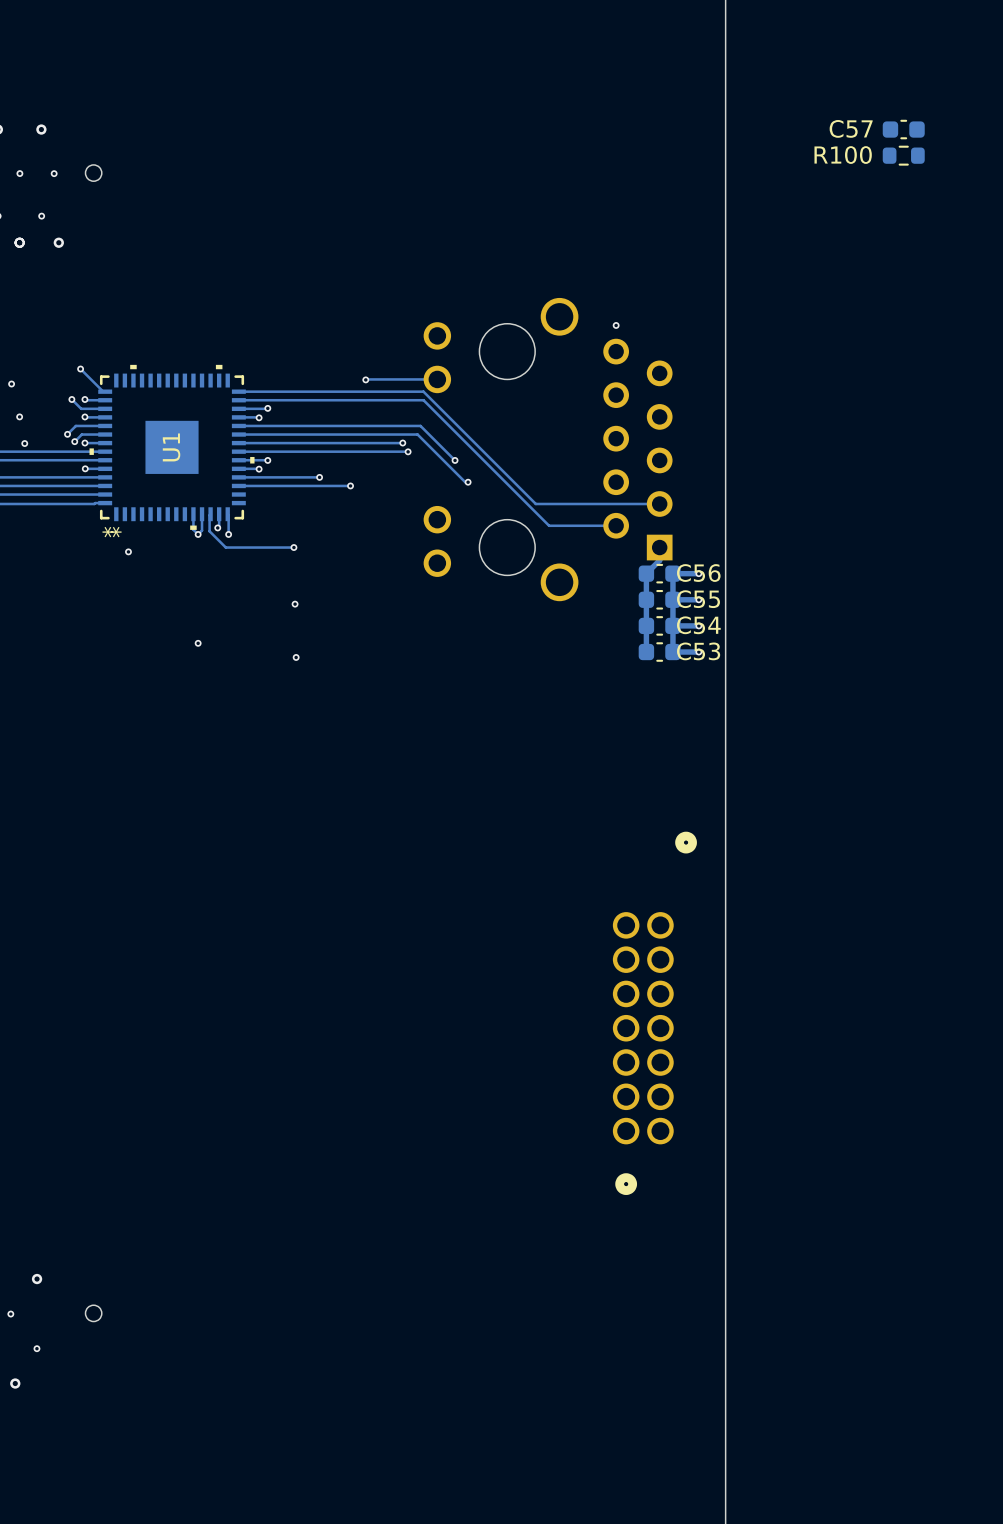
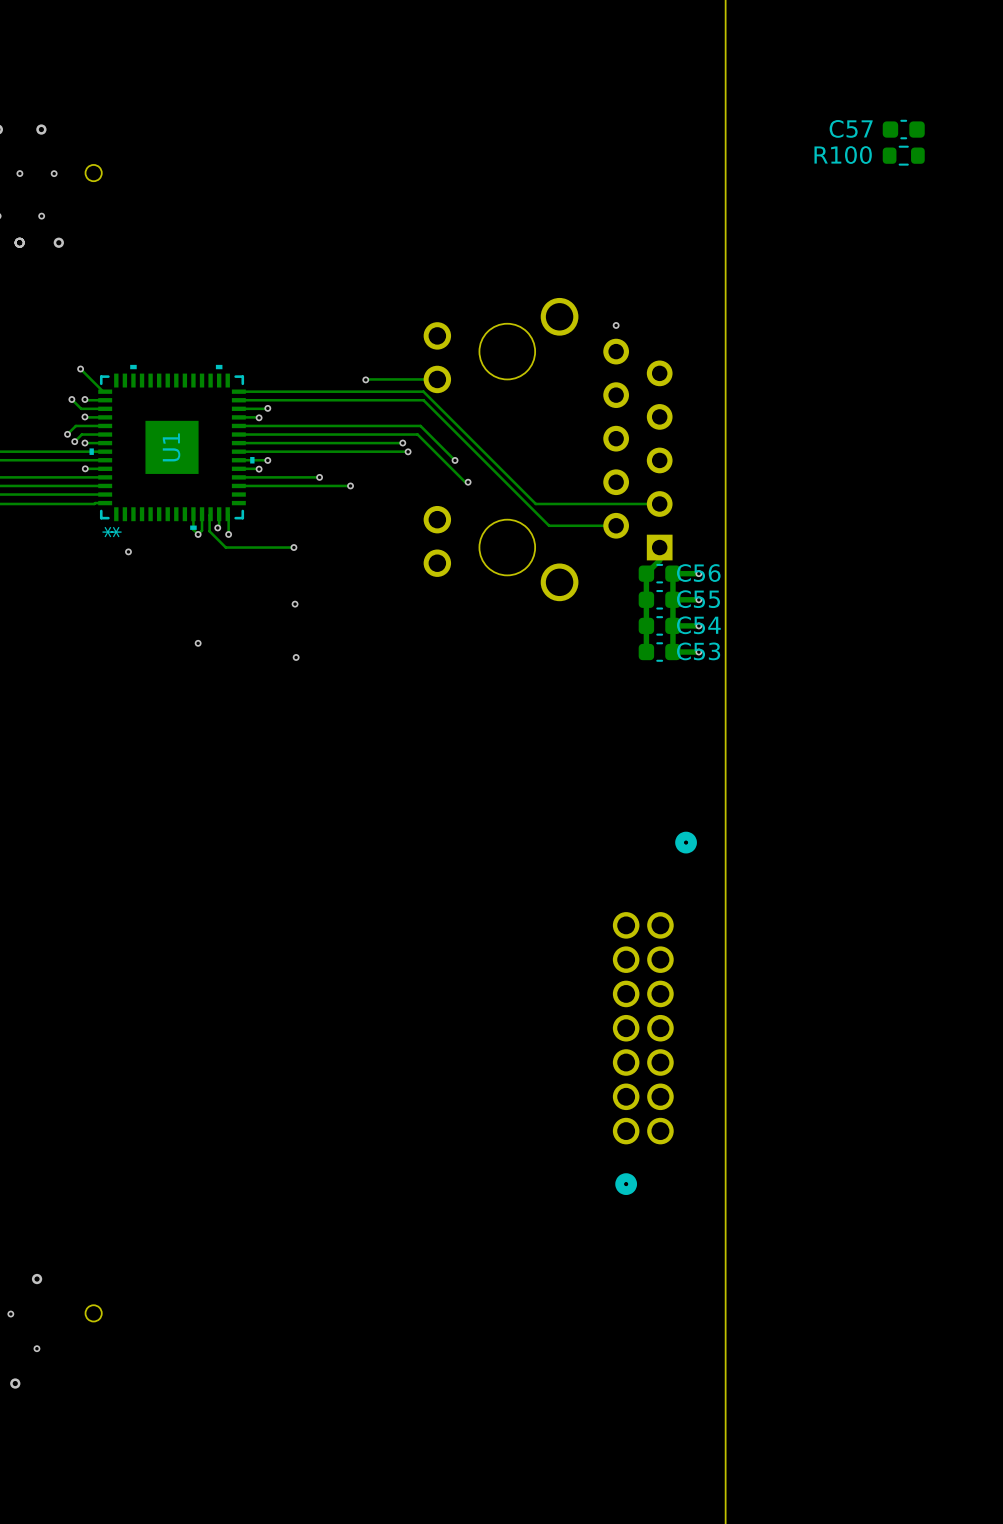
via: (11, 384) -> none
via: (19, 416) -> none
via: (24, 443) -> none

